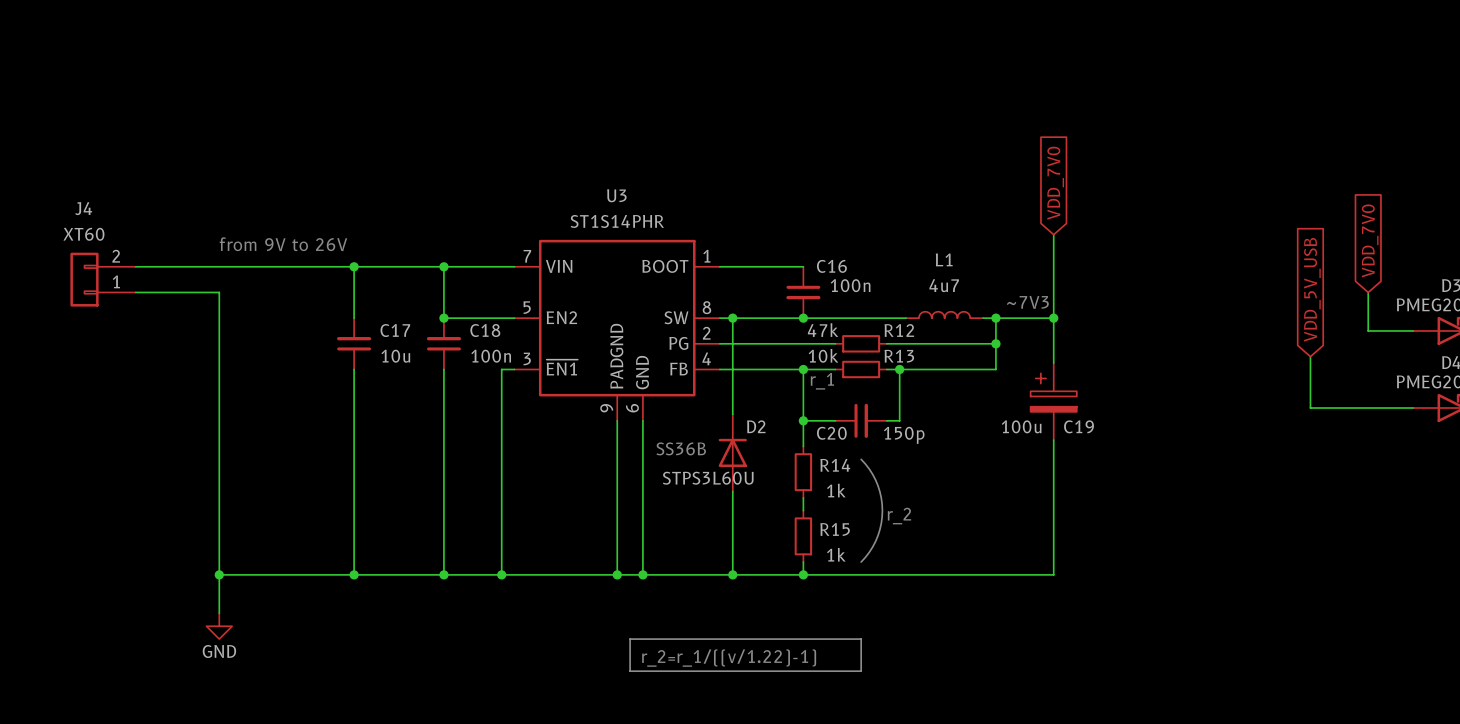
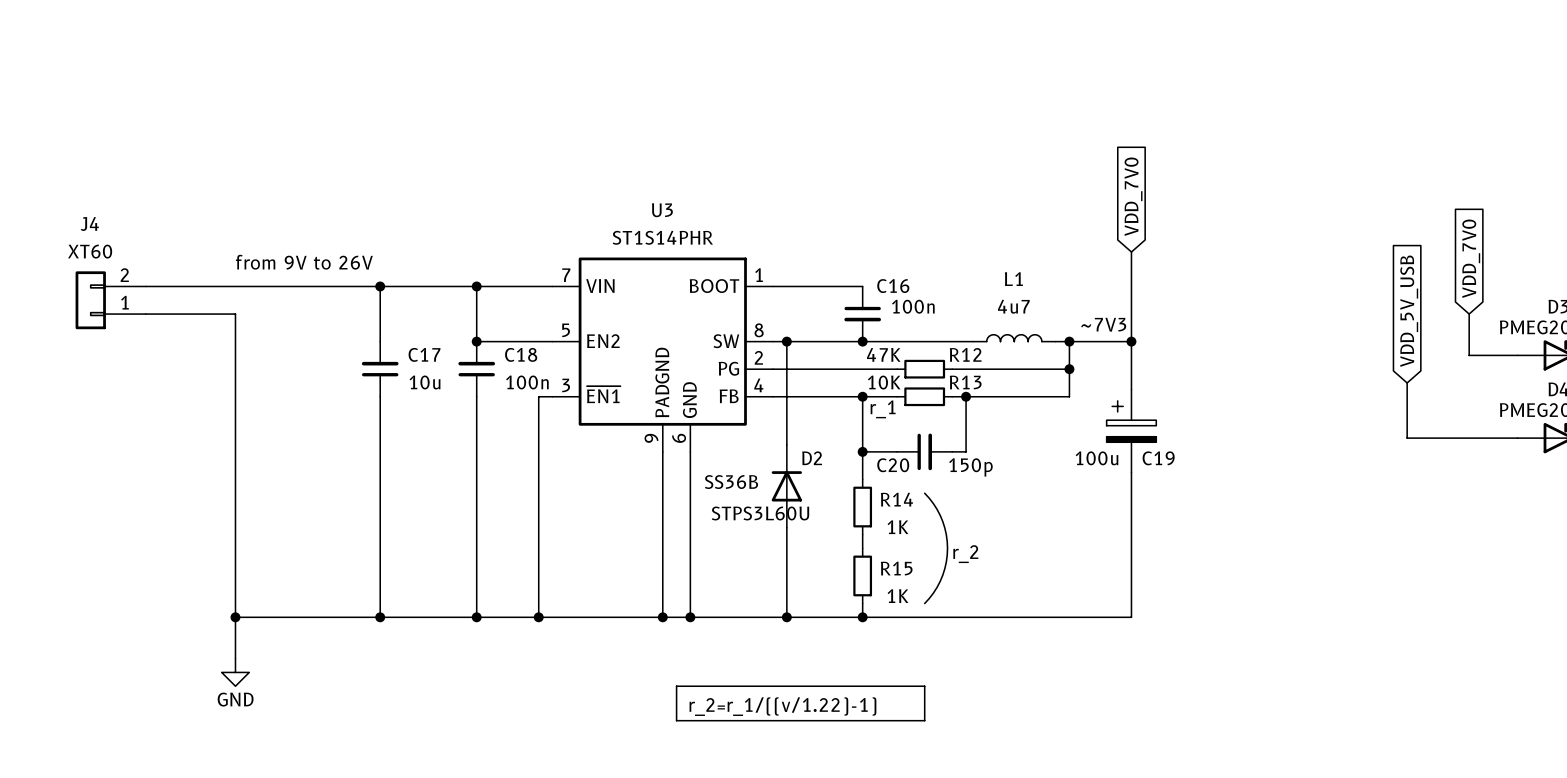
R12 value: 47k (823, 330) -> 47K (883, 354)
R13 value: 10k (823, 355) -> 10K (884, 382)
R14 value: 1k (836, 490) -> 1K (897, 527)
R15 value: 1k (836, 554) -> 1K (897, 596)

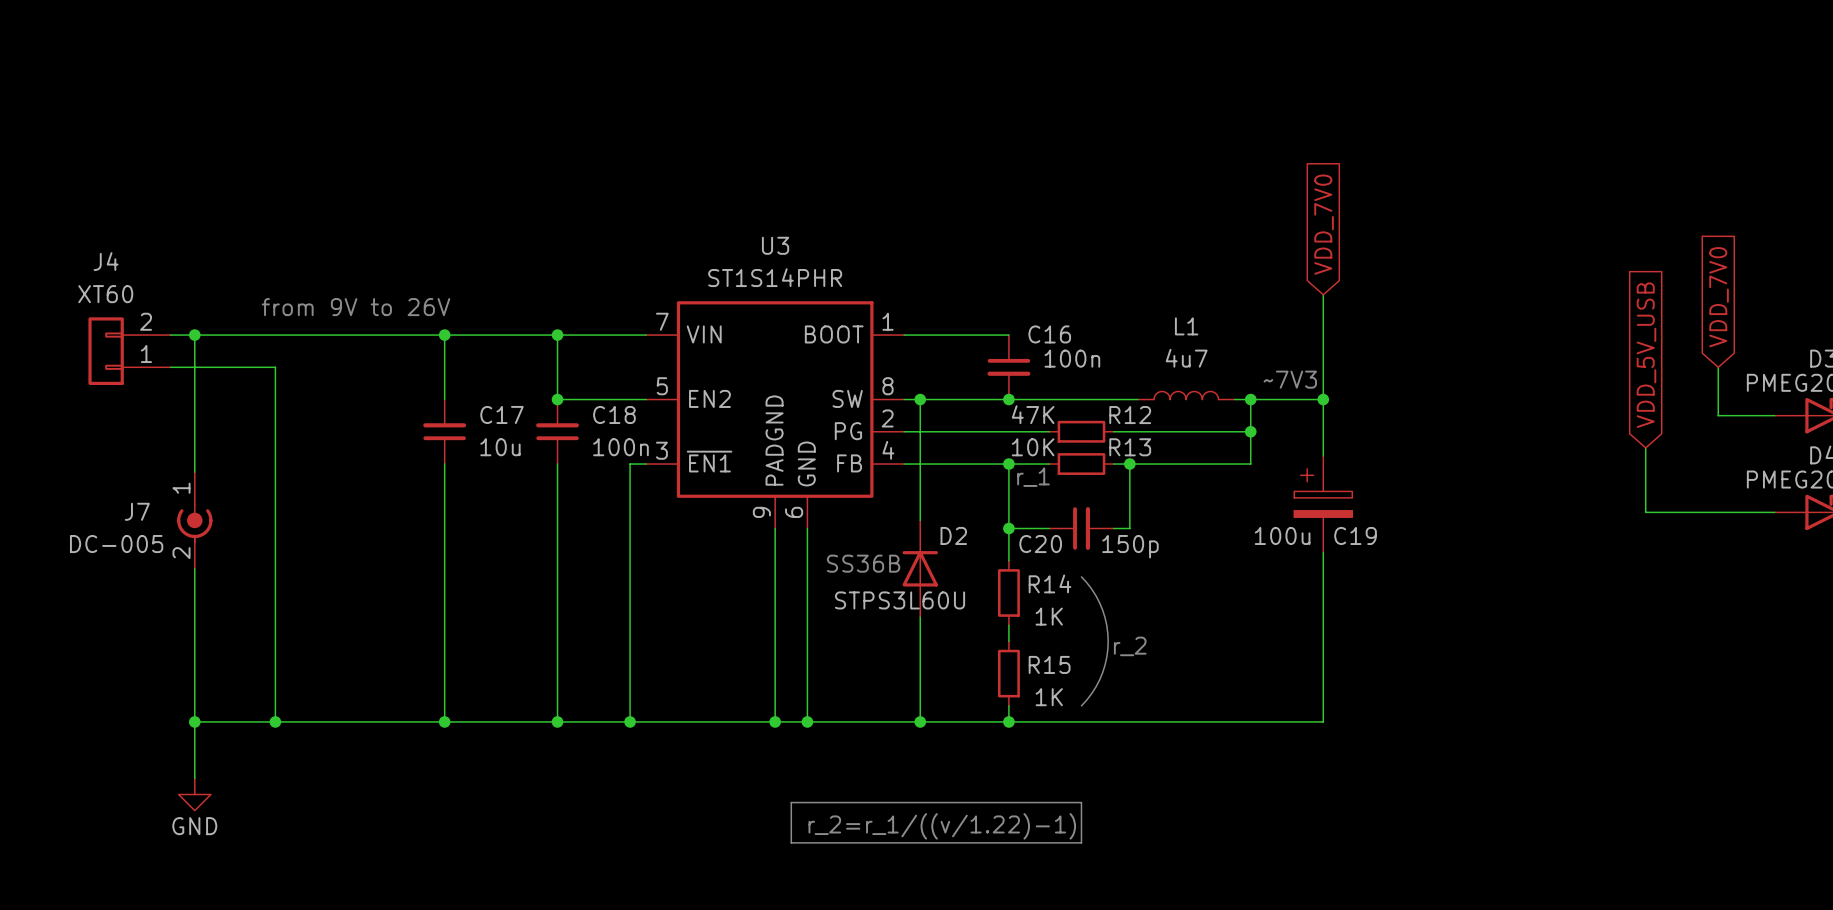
wire: none -> (194, 335) (194, 472)
junction: none -> (194, 335)
J7: none -> DC-005 (194, 520)
wire: none -> (194, 568) (194, 778)
junction: none -> (194, 721)
wire: (235, 617) (235, 658) -> (275, 721) (194, 721)
power symbol position: GND (235, 672) -> GND (194, 794)

